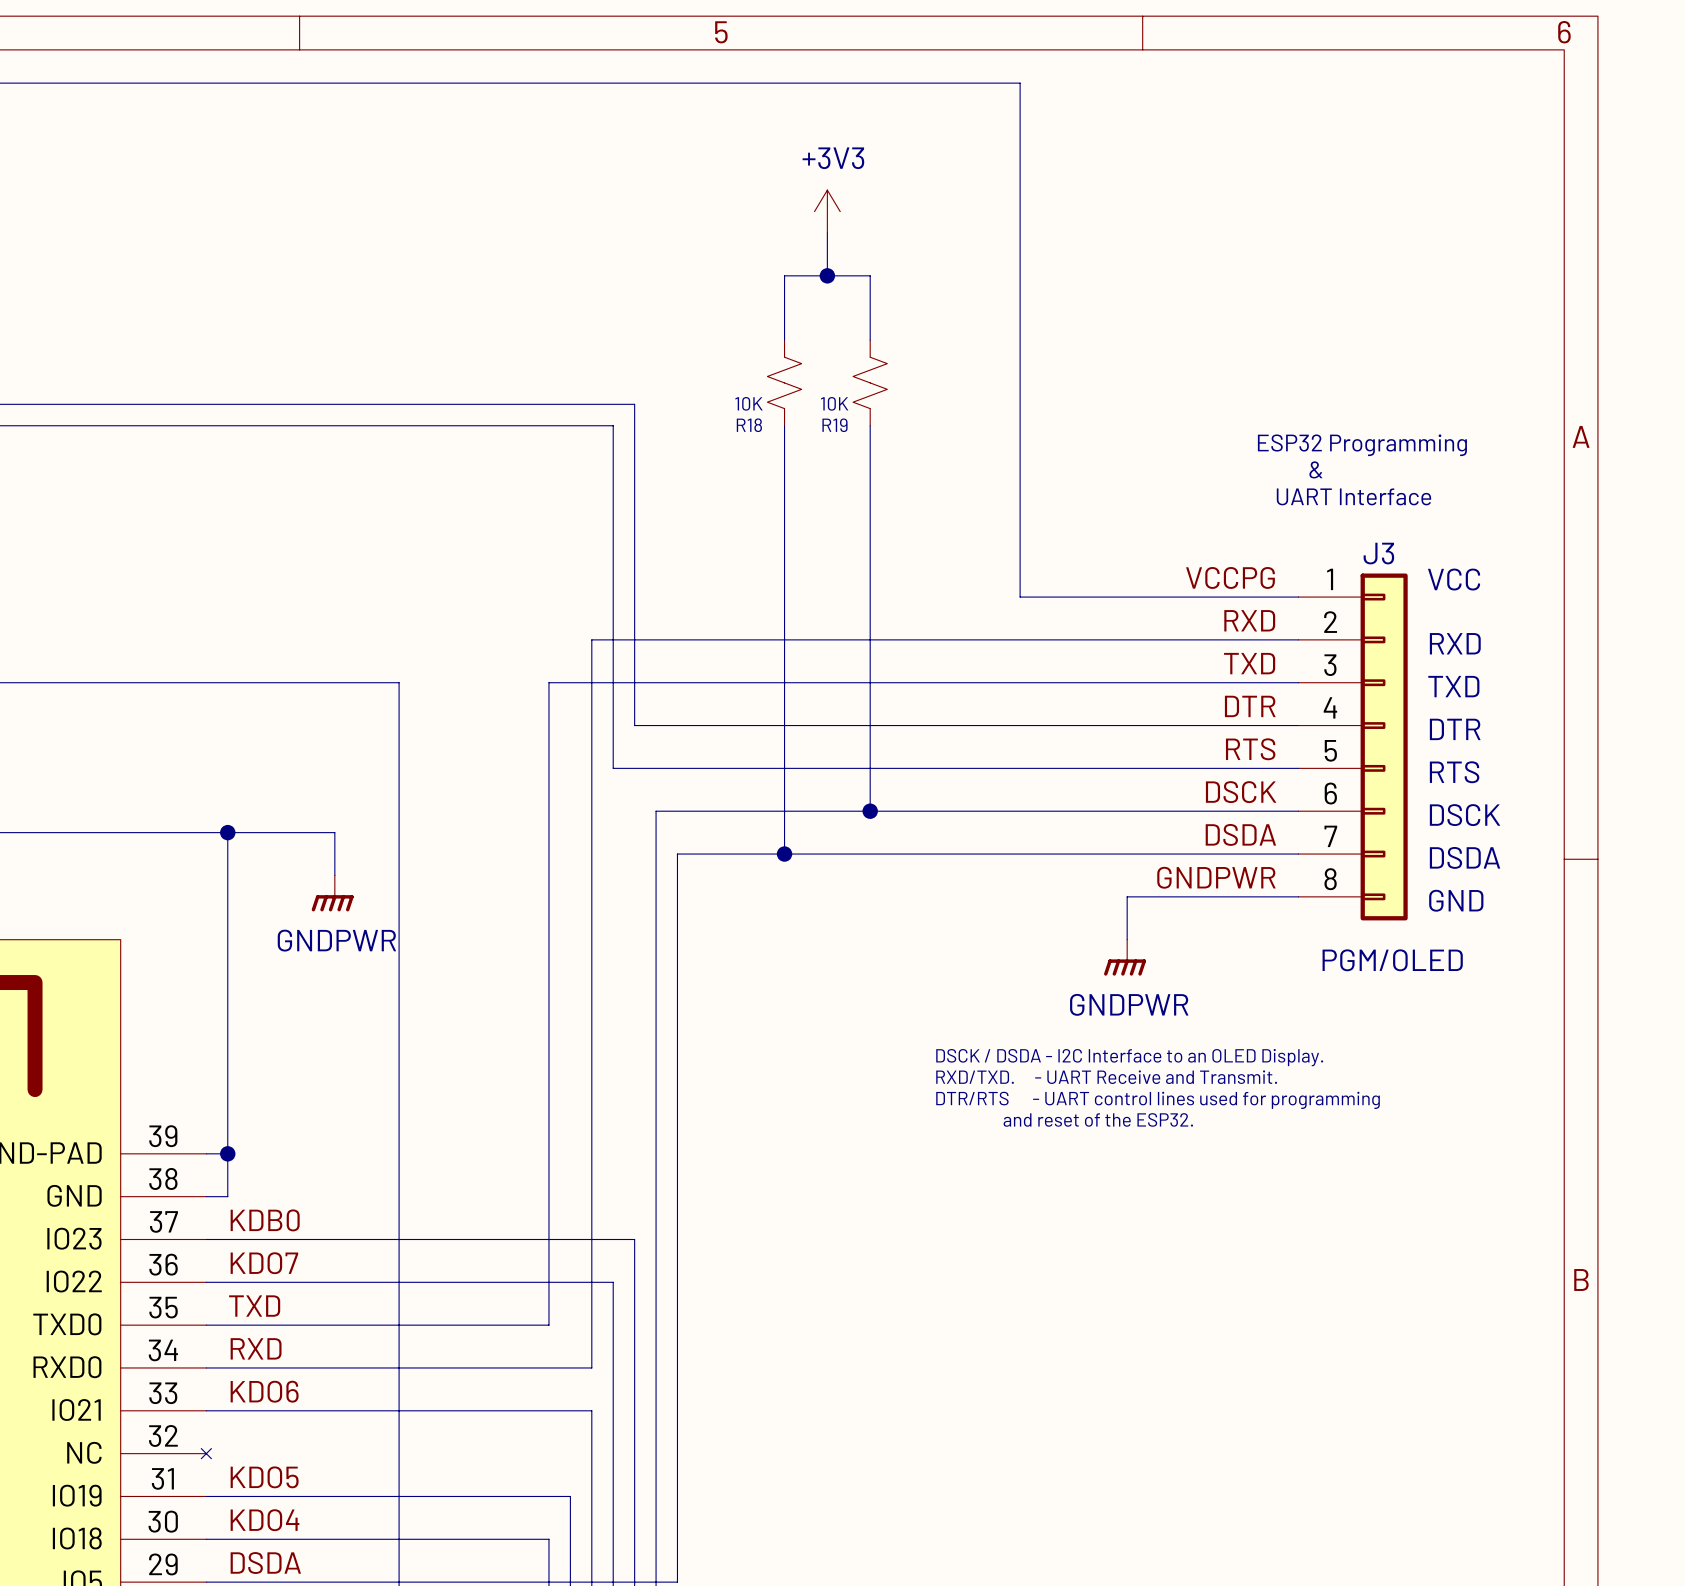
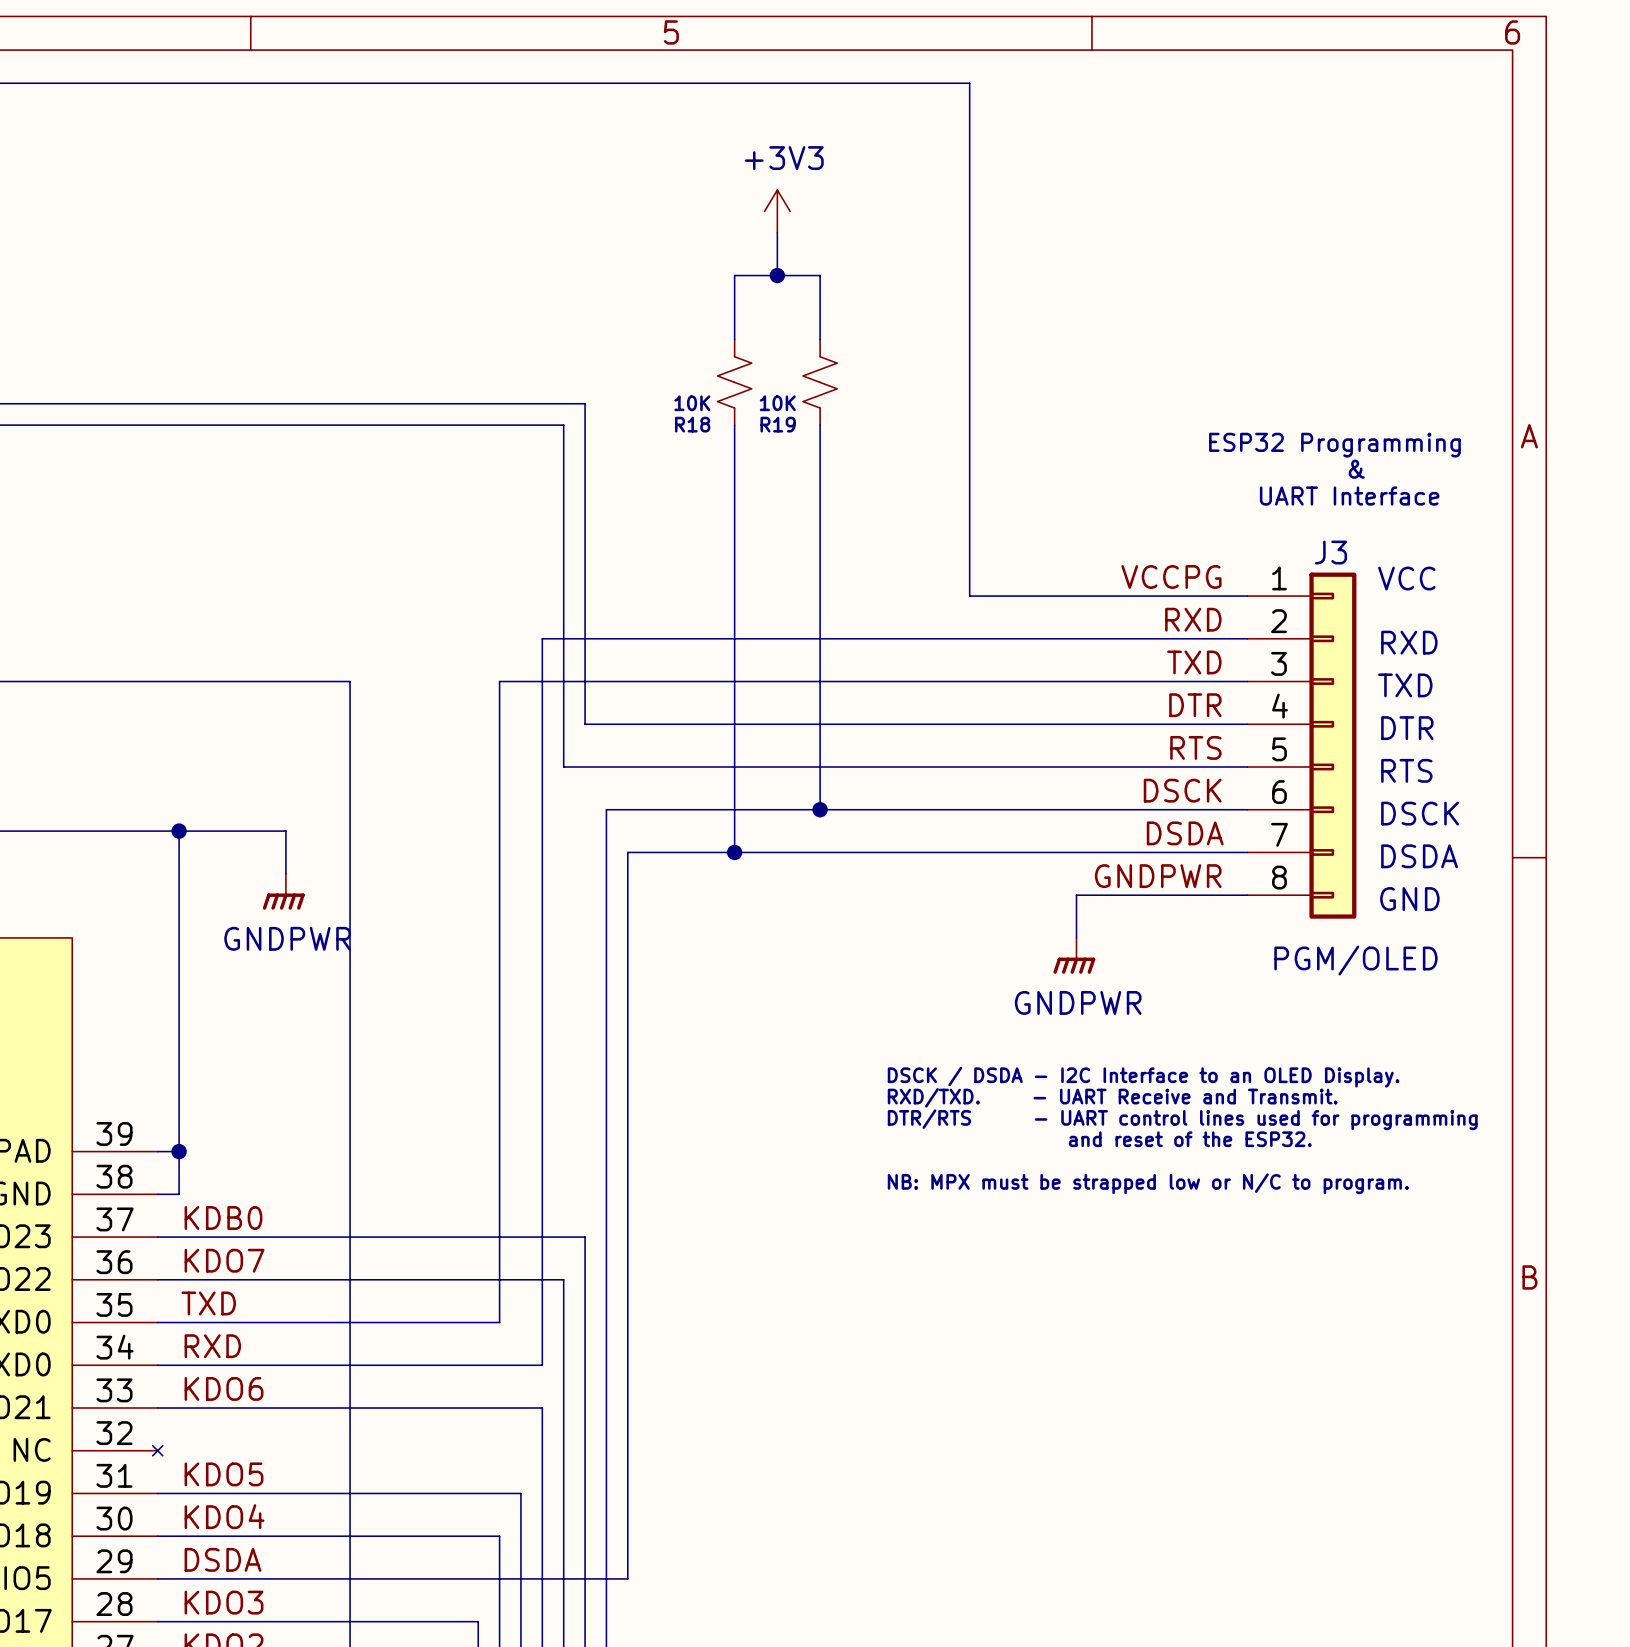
text: DSCK / DSDA - I2C Interface to an OLED Display. (1129, 1057) -> none
text: RXD/TXD. - UART Receive and Transmit. (1106, 1077) -> DSCK / DSDA - I2C Interface to an OLED Display. (1143, 1077)
text: DTR/RTS - UART control lines used for programming (1158, 1100) -> RXD/TXD. - UART Receive and Transmit. (1112, 1097)
text: and reset of the ESP32. (1098, 1119) -> DTR/RTS - UART control lines used for programming (1182, 1119)
text: none -> and reset of the ESP32. (1190, 1139)
text: none -> NB: MPX must be strapped low or N/C to program. (1148, 1183)

